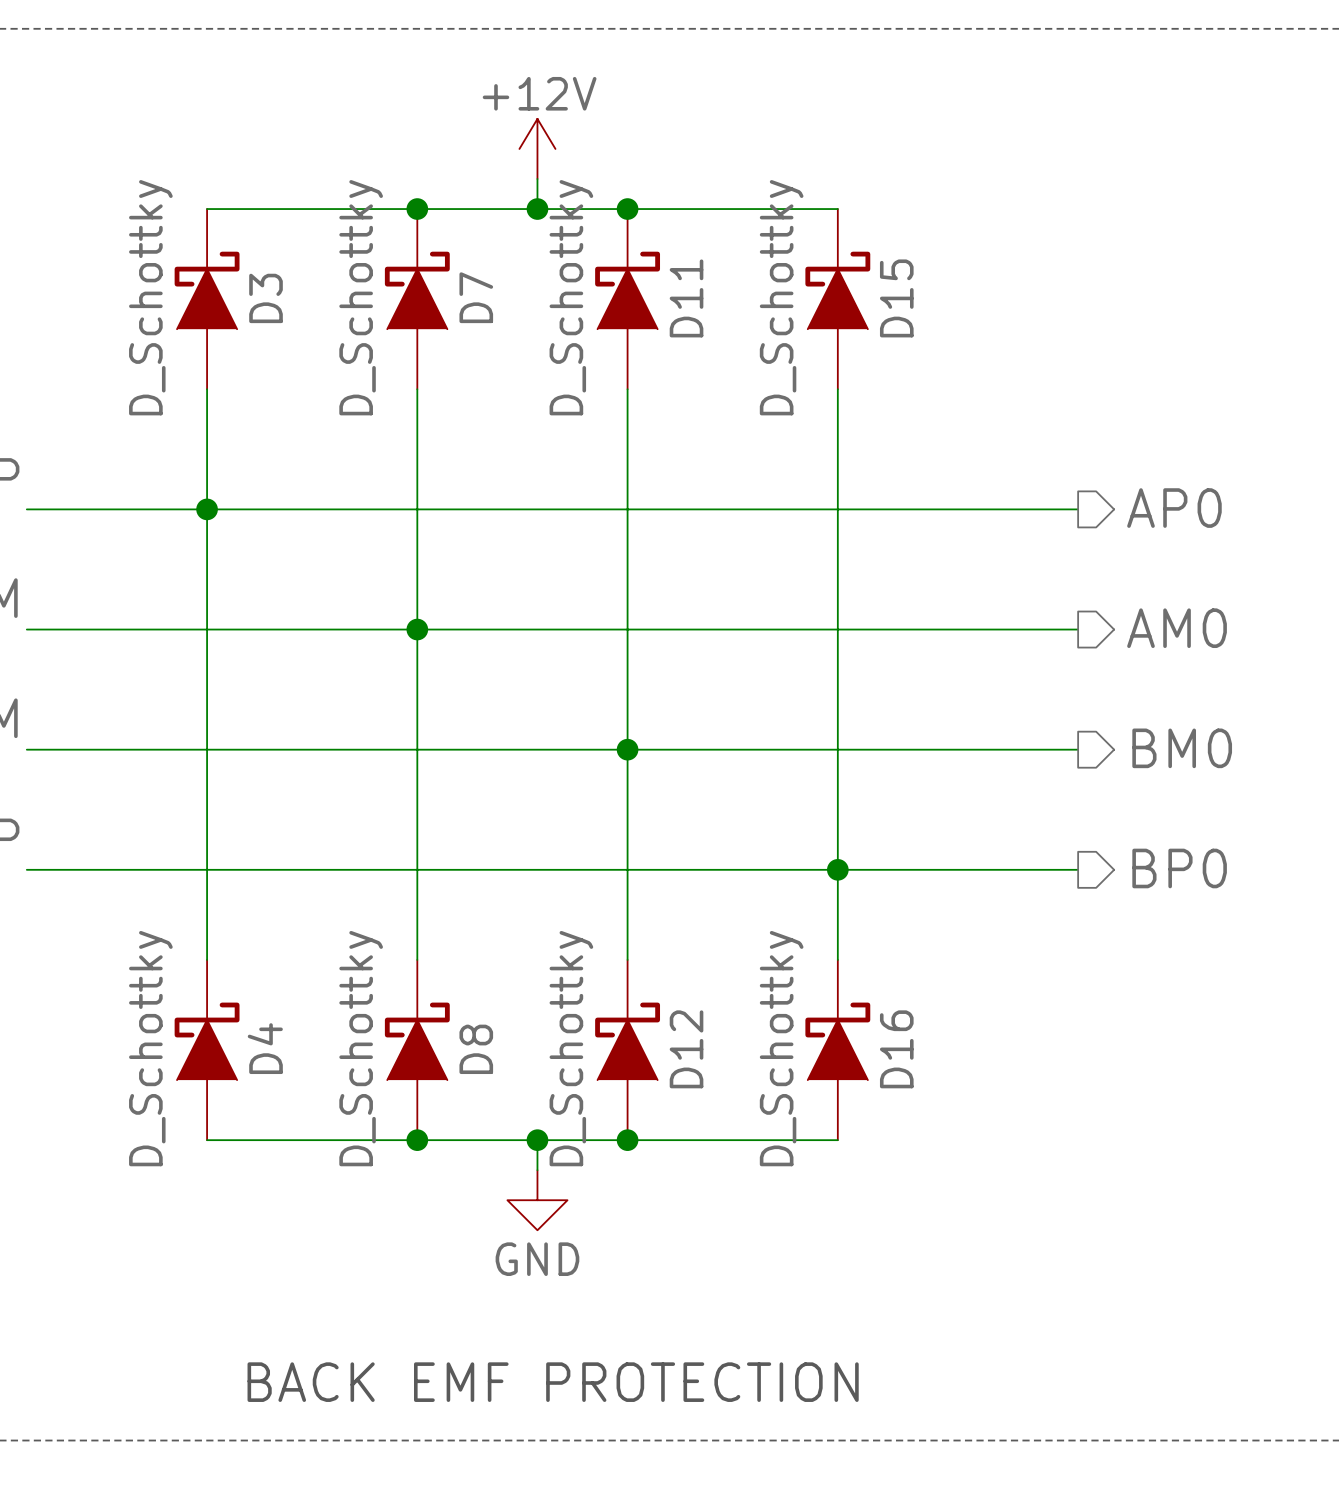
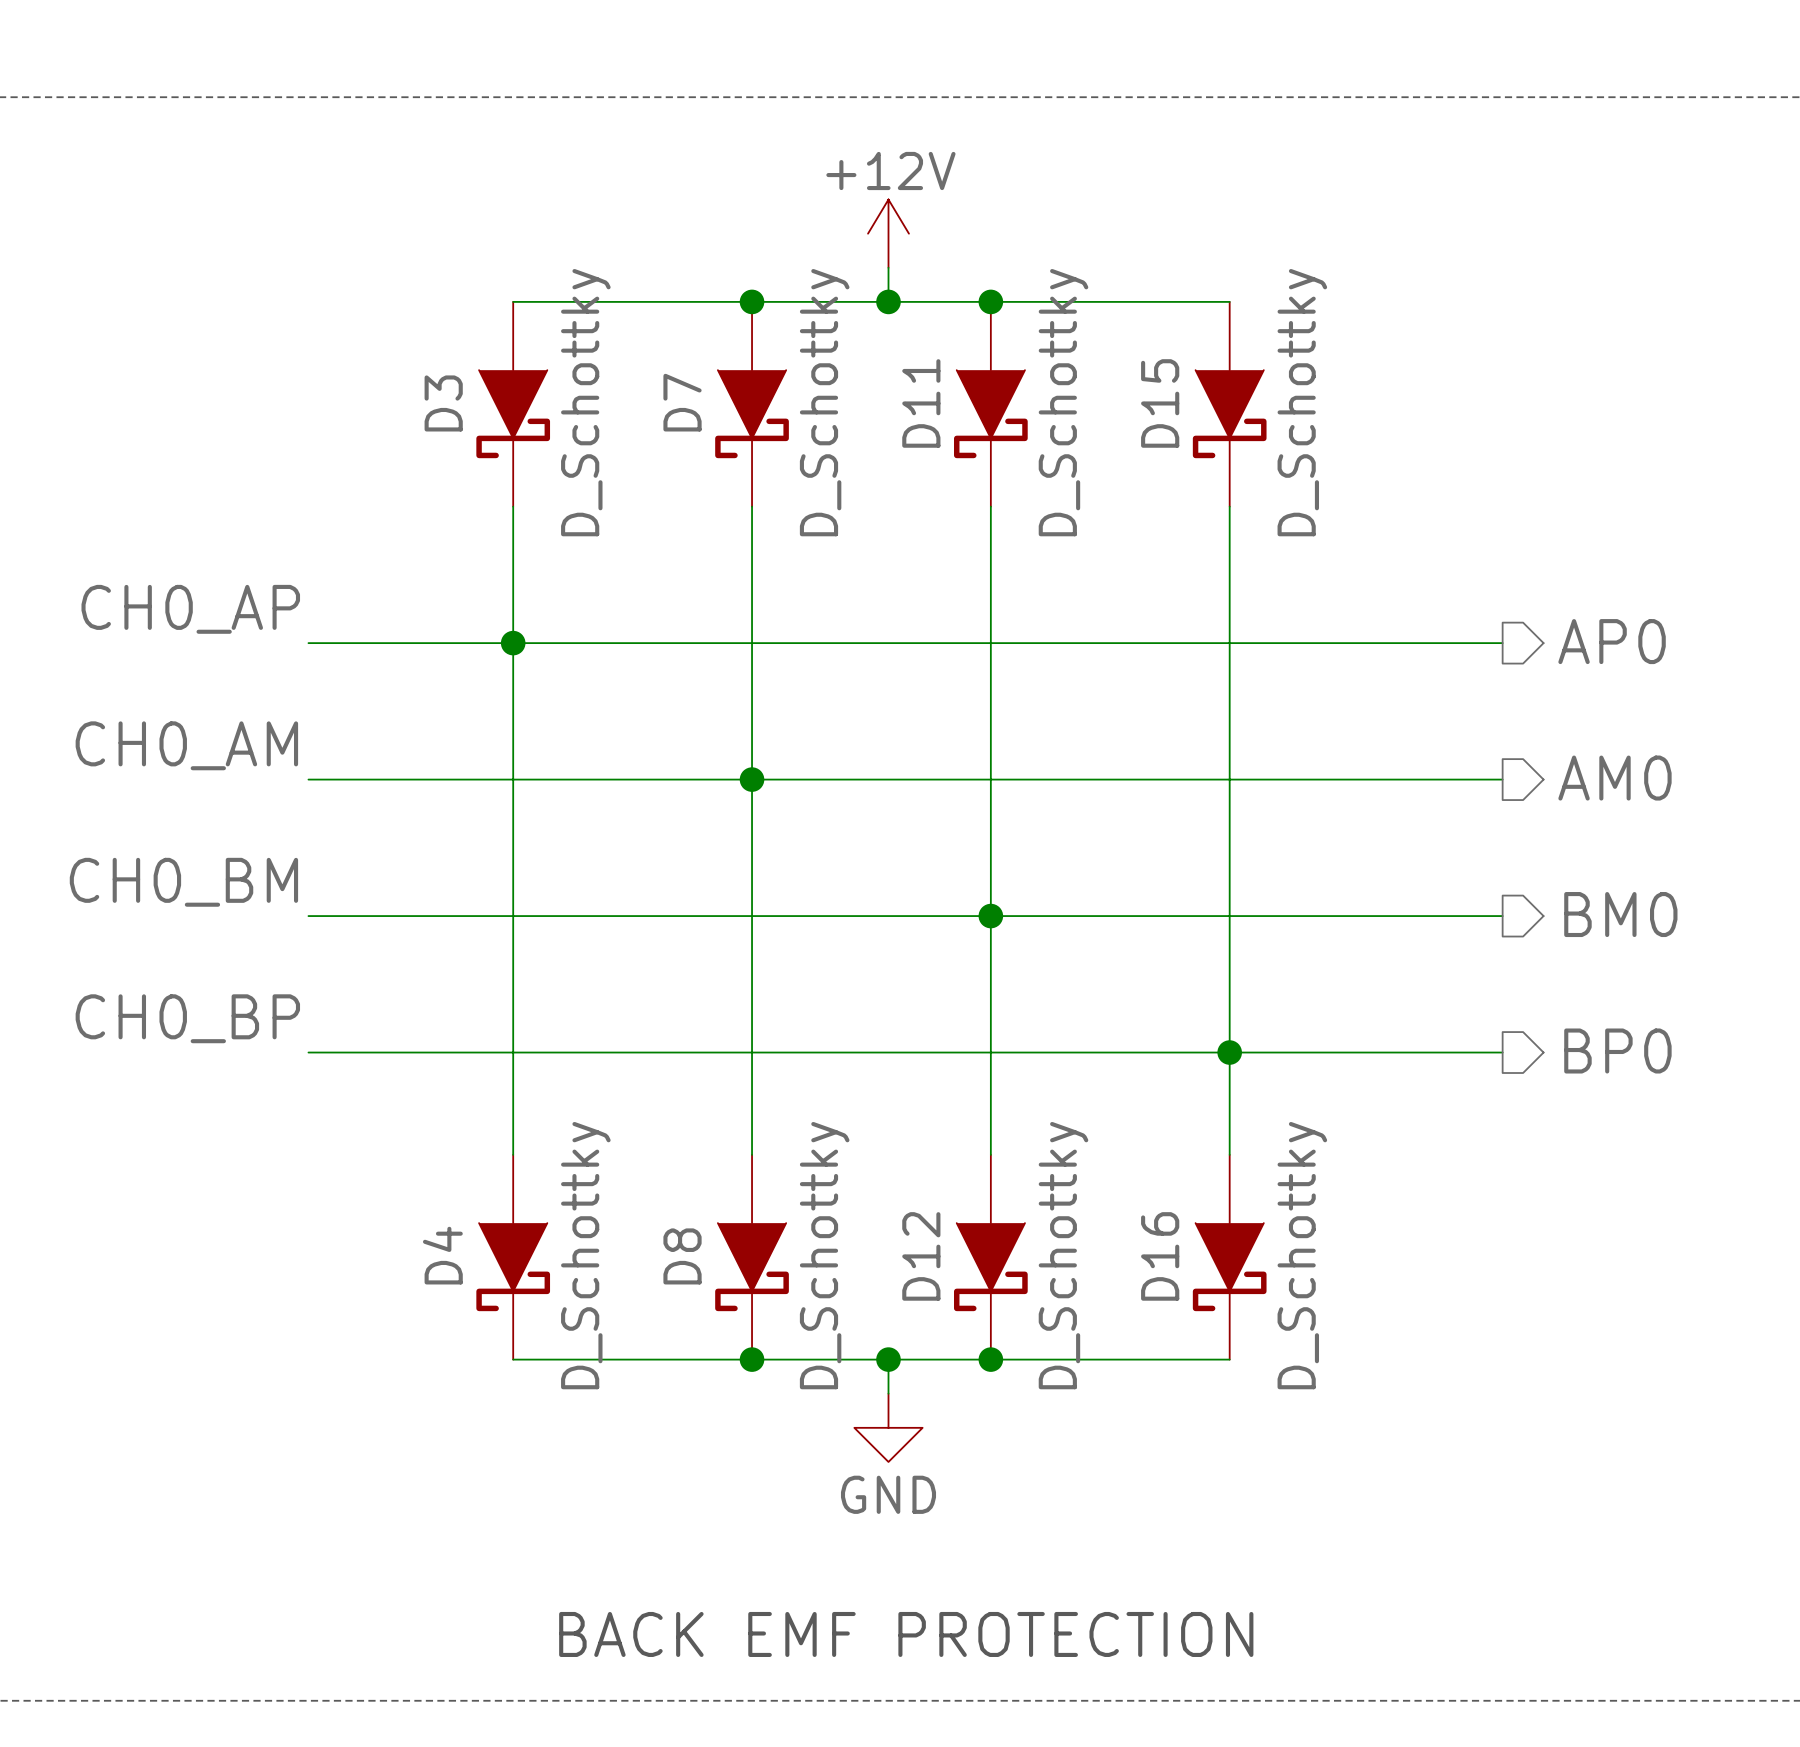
D3 rotation: 0° (207, 290) -> 180° (513, 414)
D7 rotation: 0° (417, 290) -> 180° (752, 414)
D11 rotation: 0° (627, 290) -> 180° (990, 414)
D15 rotation: 0° (837, 290) -> 180° (1229, 414)
D4 rotation: 0° (207, 1041) -> 180° (513, 1267)
D8 rotation: 0° (417, 1041) -> 180° (752, 1267)
D12 rotation: 0° (627, 1041) -> 180° (990, 1267)
D16 rotation: 0° (837, 1041) -> 180° (1229, 1267)

